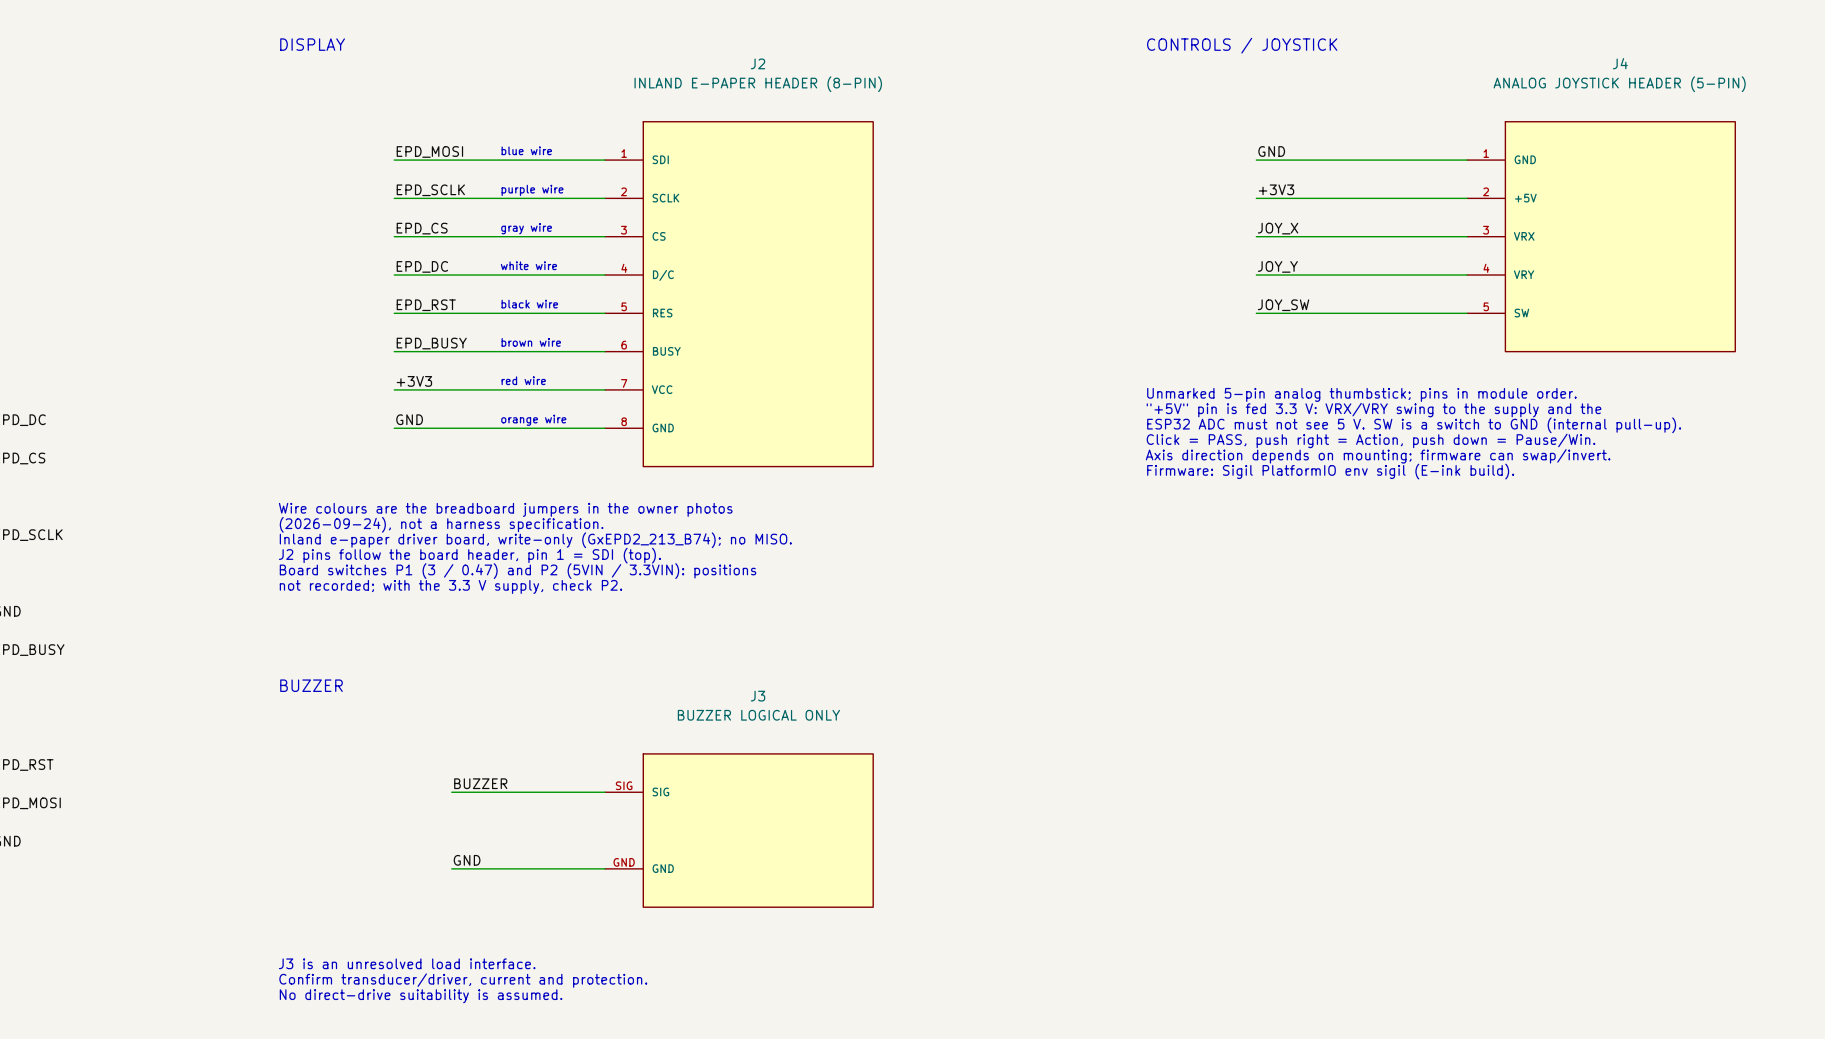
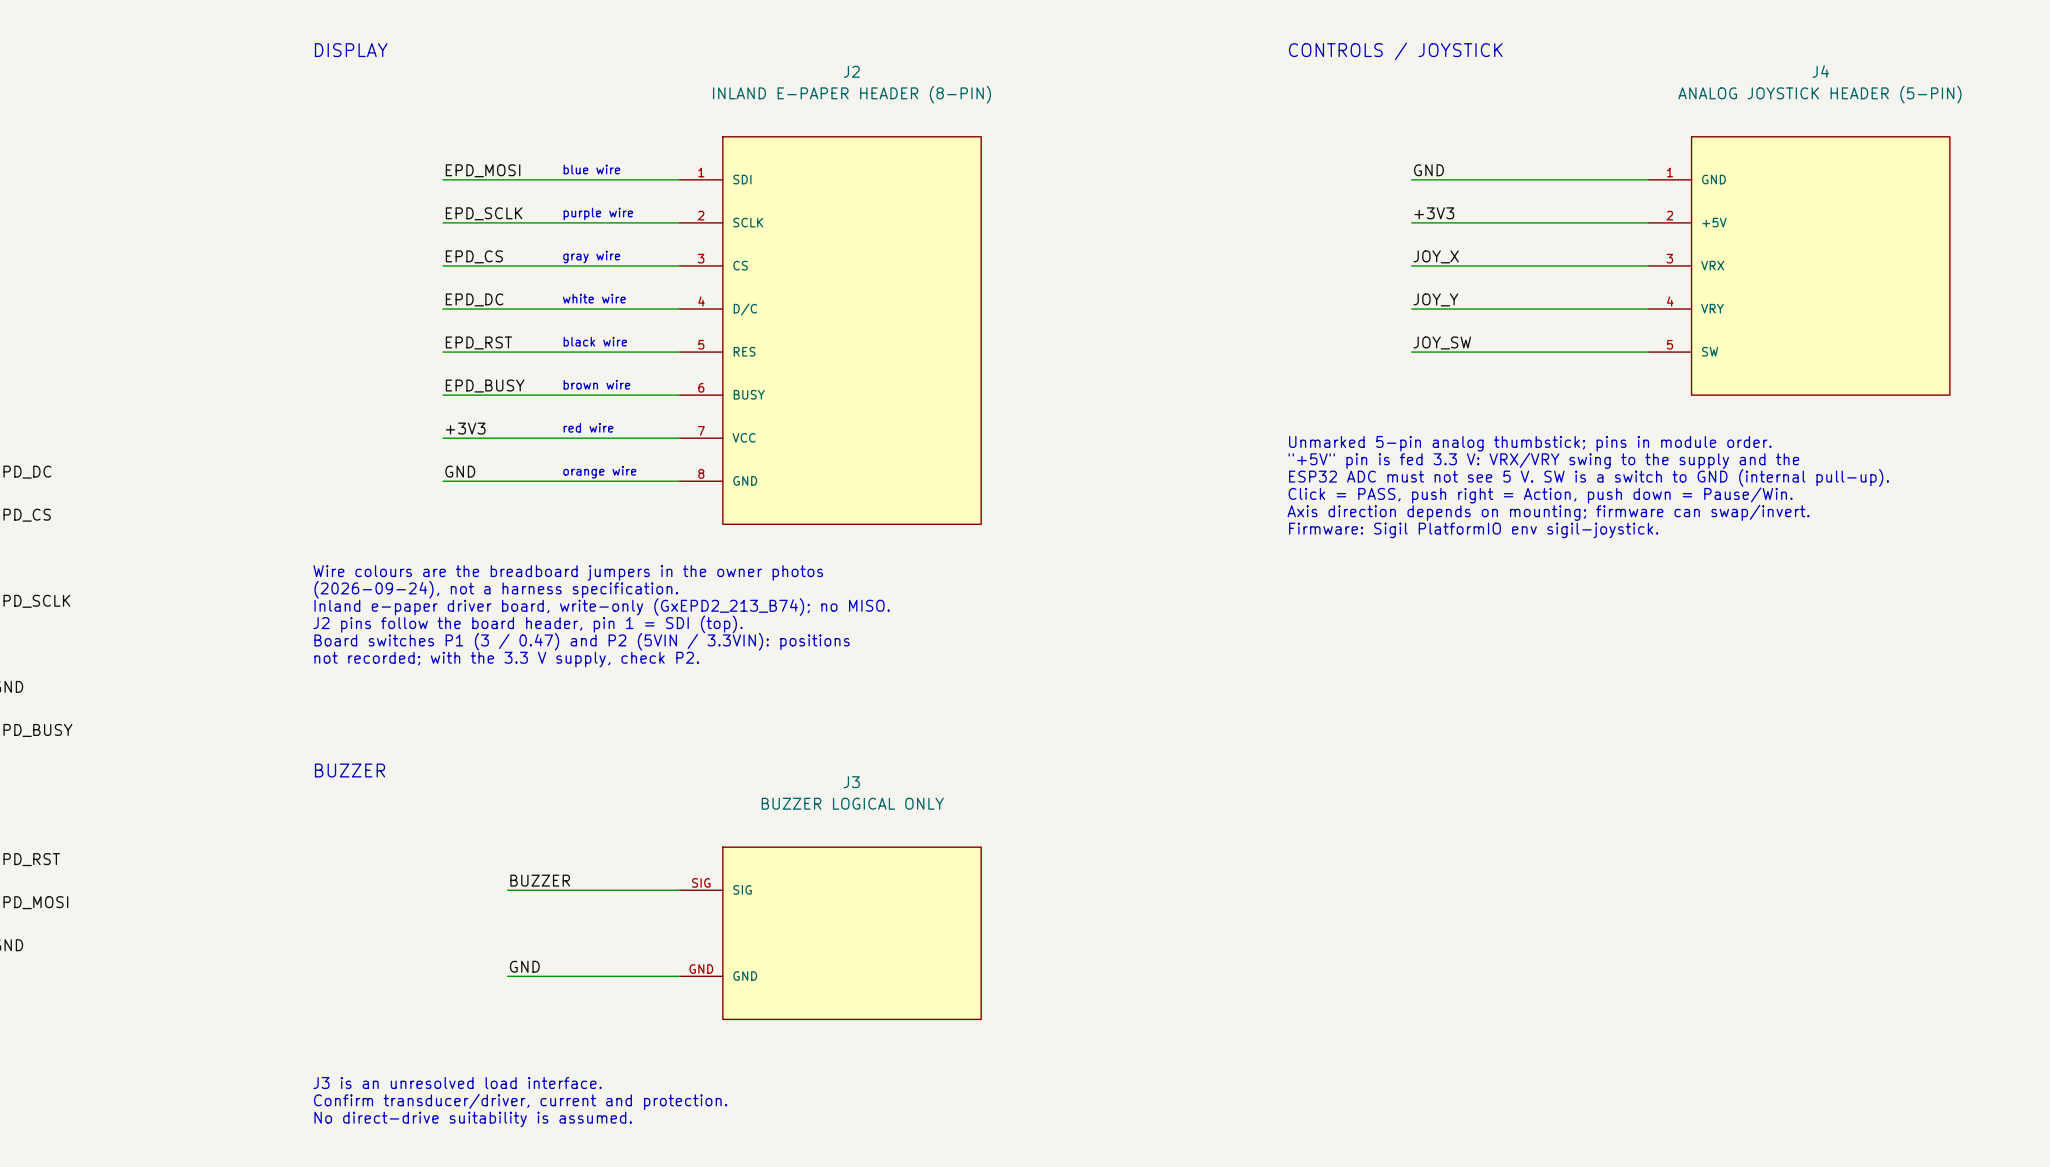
text: Firmware: Sigil PlatformIO env sigil (E-ink build). (1330, 471) -> Firmware: Sigil PlatformIO env sigil-joystick. (1473, 530)

